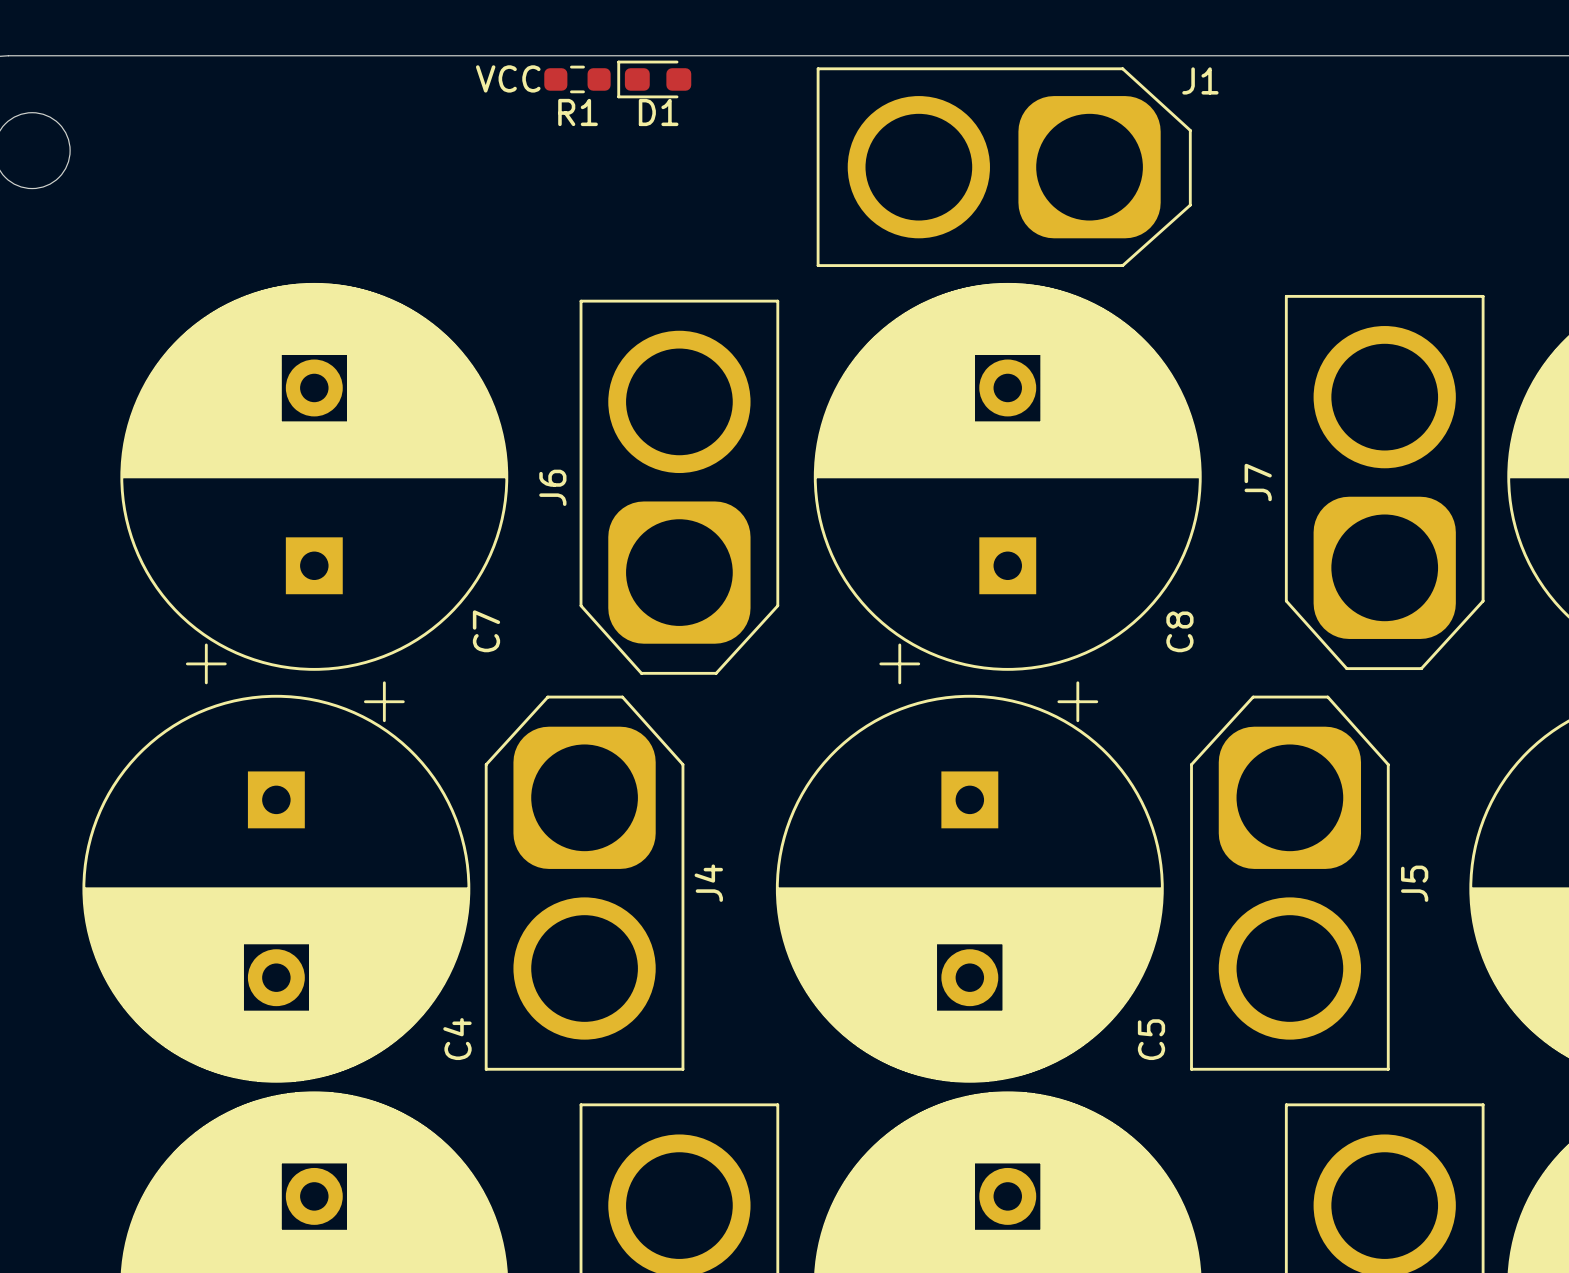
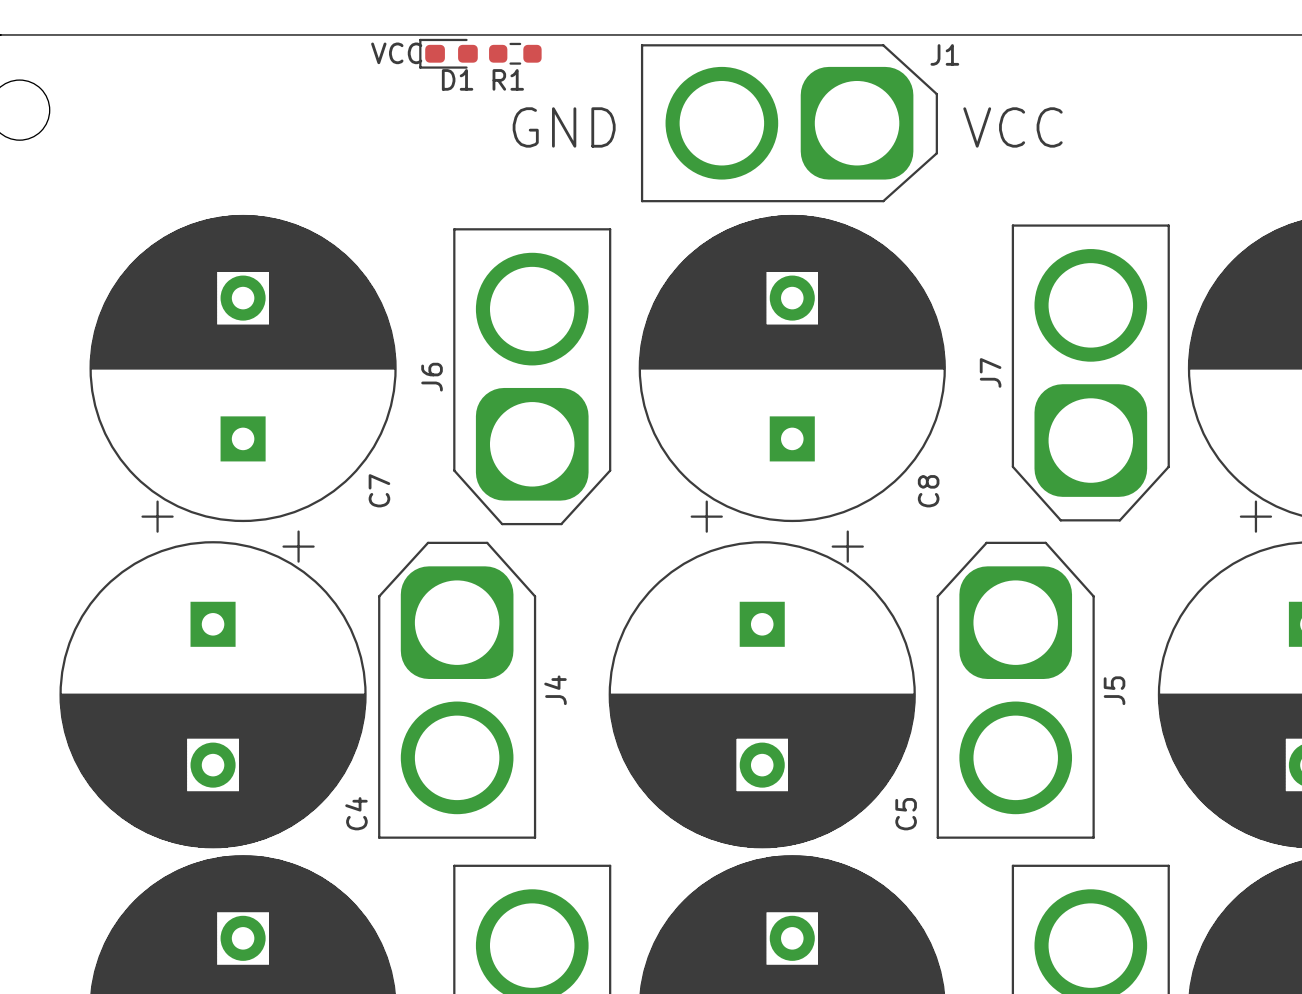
R1 position: (577, 79) -> (515, 53)
D1 position: (654, 79) -> (448, 53)
R1 name position: R1 (578, 112) -> R1 (508, 79)
D1 name position: D1 (658, 112) -> D1 (457, 79)
text: none -> GND (564, 127)
text: none -> VCC (1012, 127)

